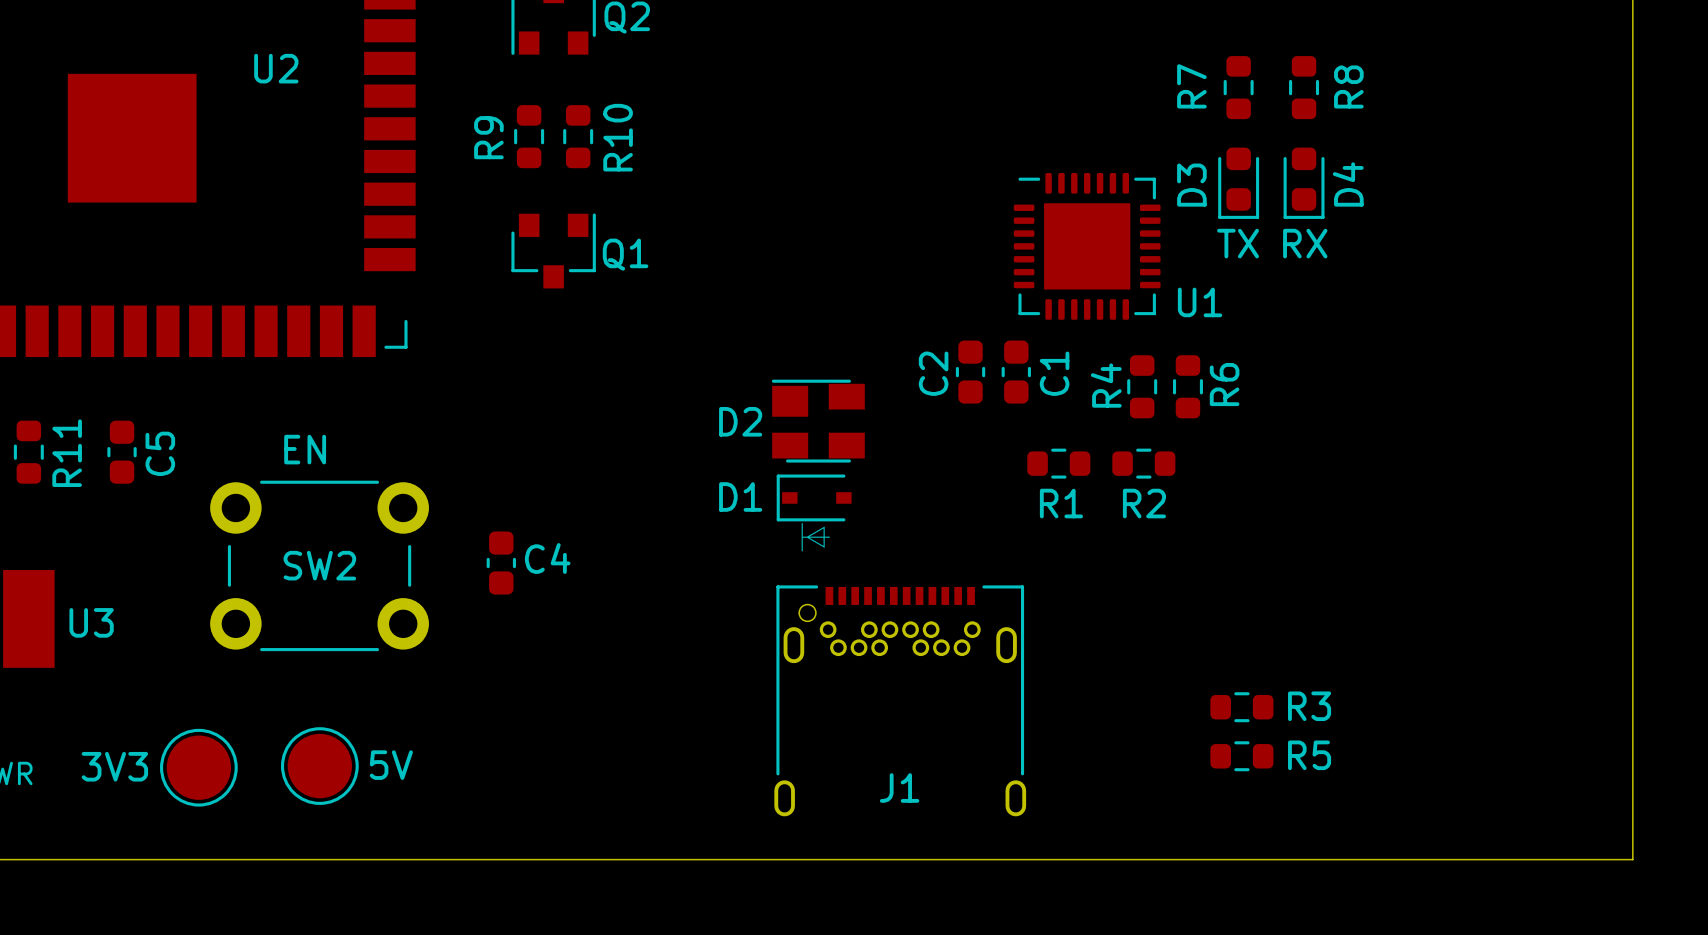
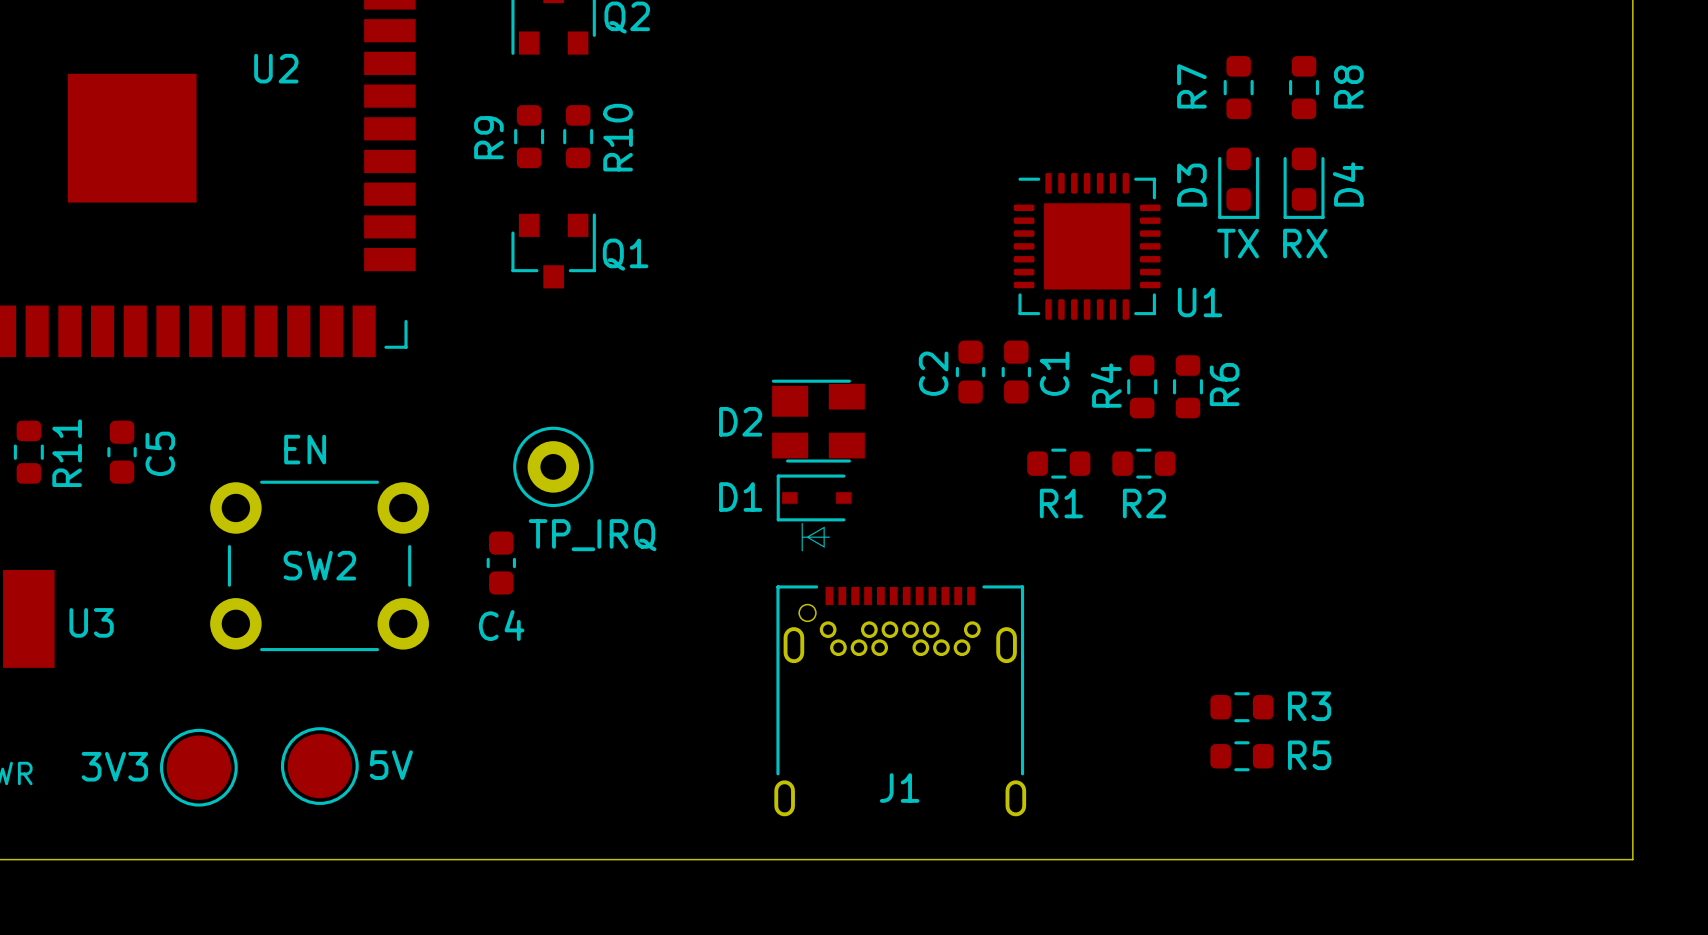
part: none -> TP_IRQ (553, 466)
C4 name position: C4 (547, 558) -> C4 (501, 625)

